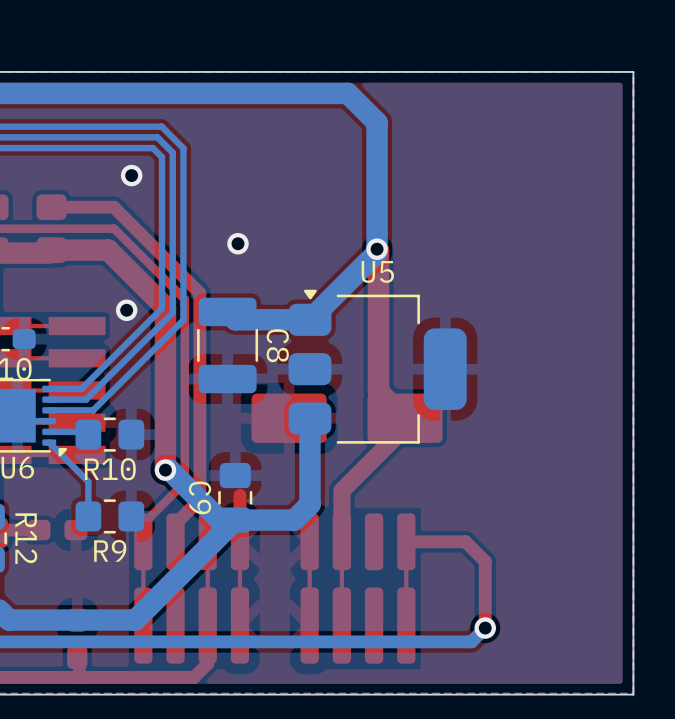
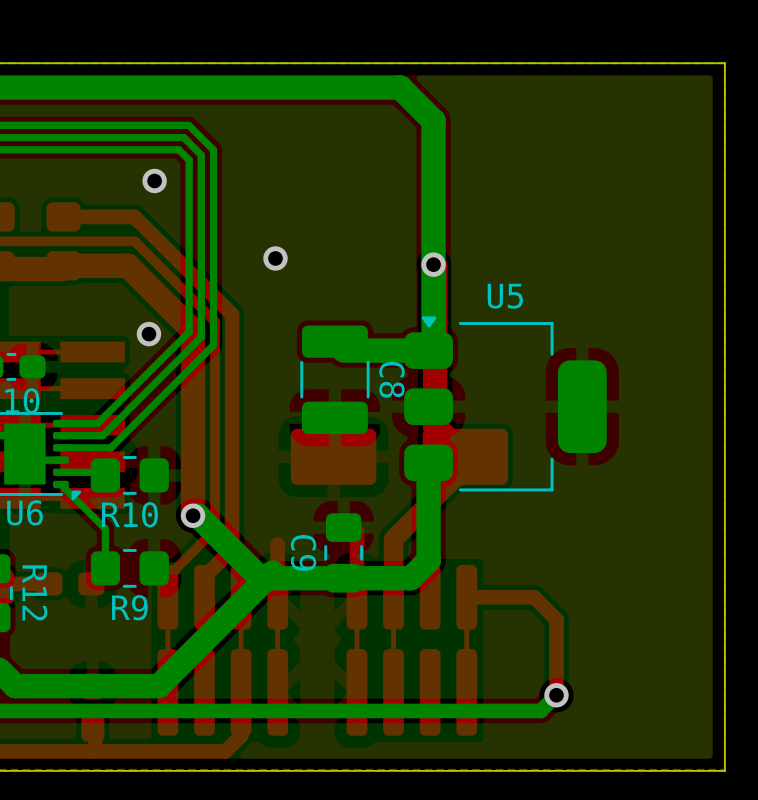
bottom track: (377, 252) (309, 319) (235, 319) (227, 311) -> (433, 268) (433, 345) (428, 350) (343, 350)
C8 position: (227, 345) -> (334, 379)
U5 position: (377, 366) -> (505, 403)
bottom track: (309, 418) (309, 504) (294, 520) (219, 520) -> (428, 462) (428, 560) (410, 578) (260, 578) (254, 572)
C9 position: (235, 497) -> (343, 552)

